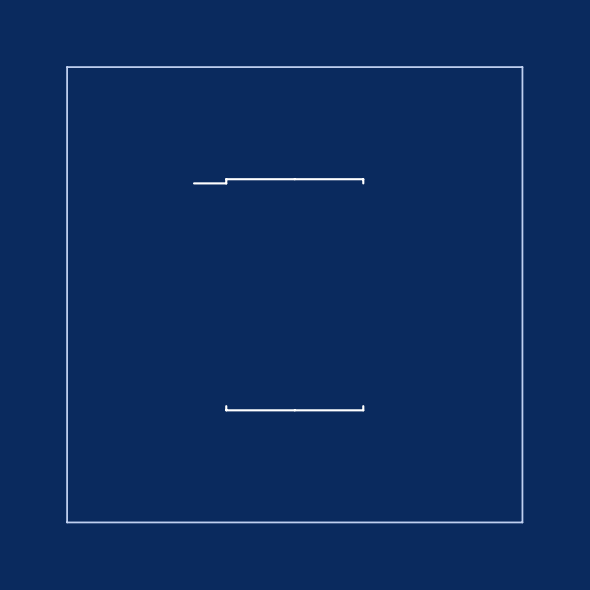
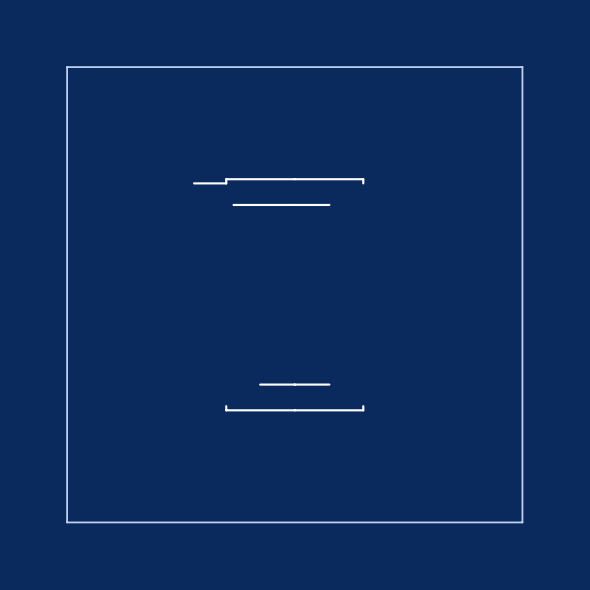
drawing: none -> [232, 203, 331, 386]

